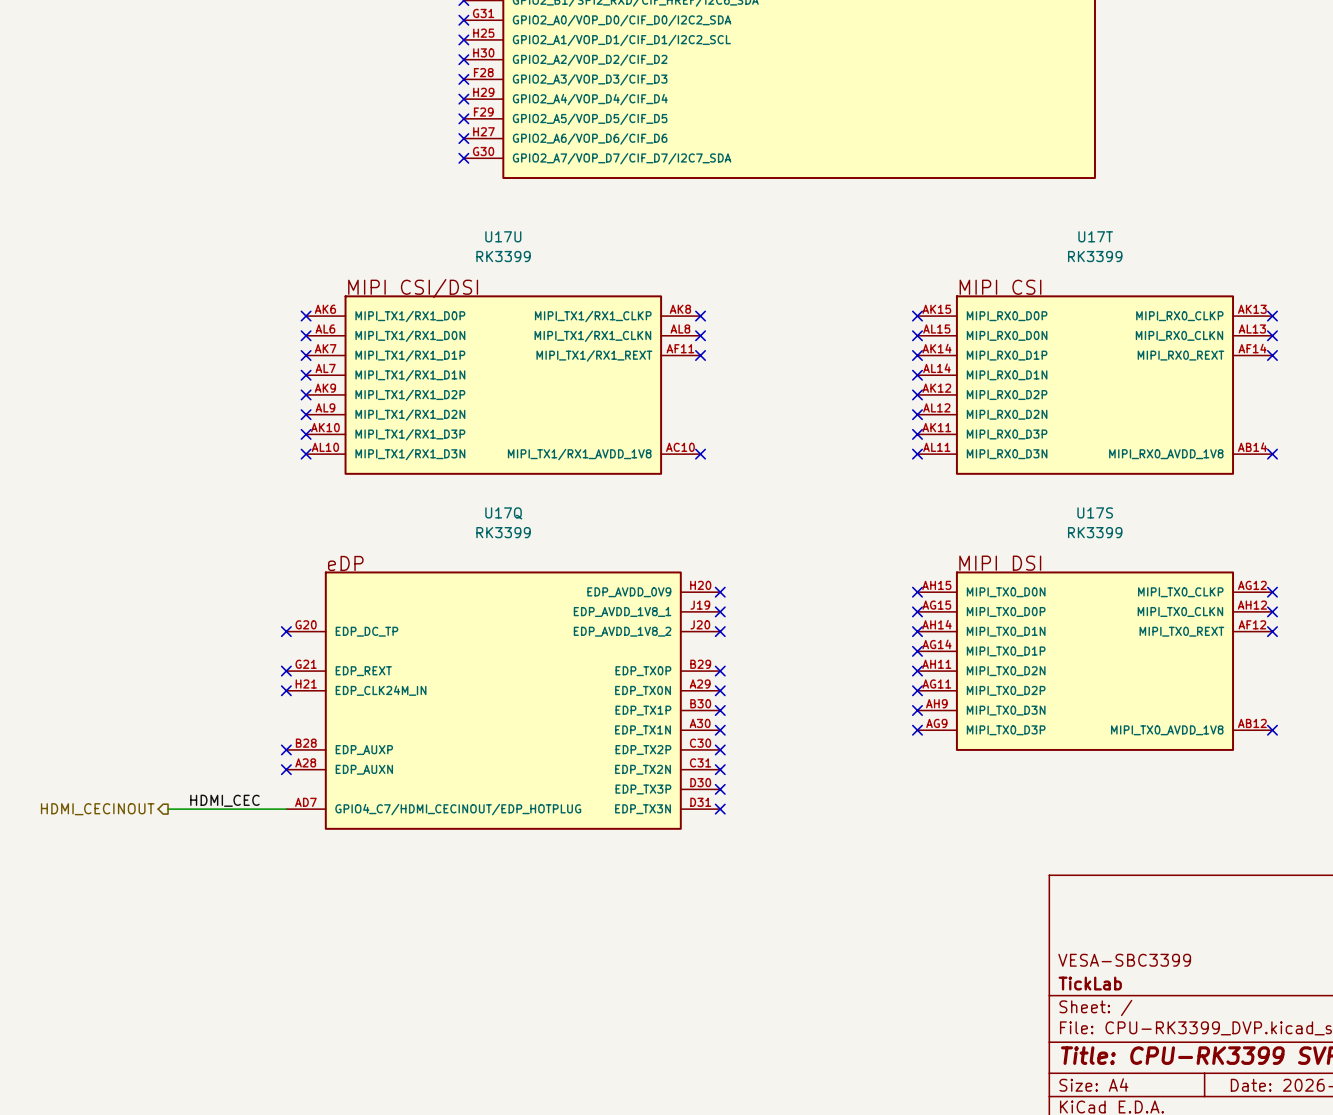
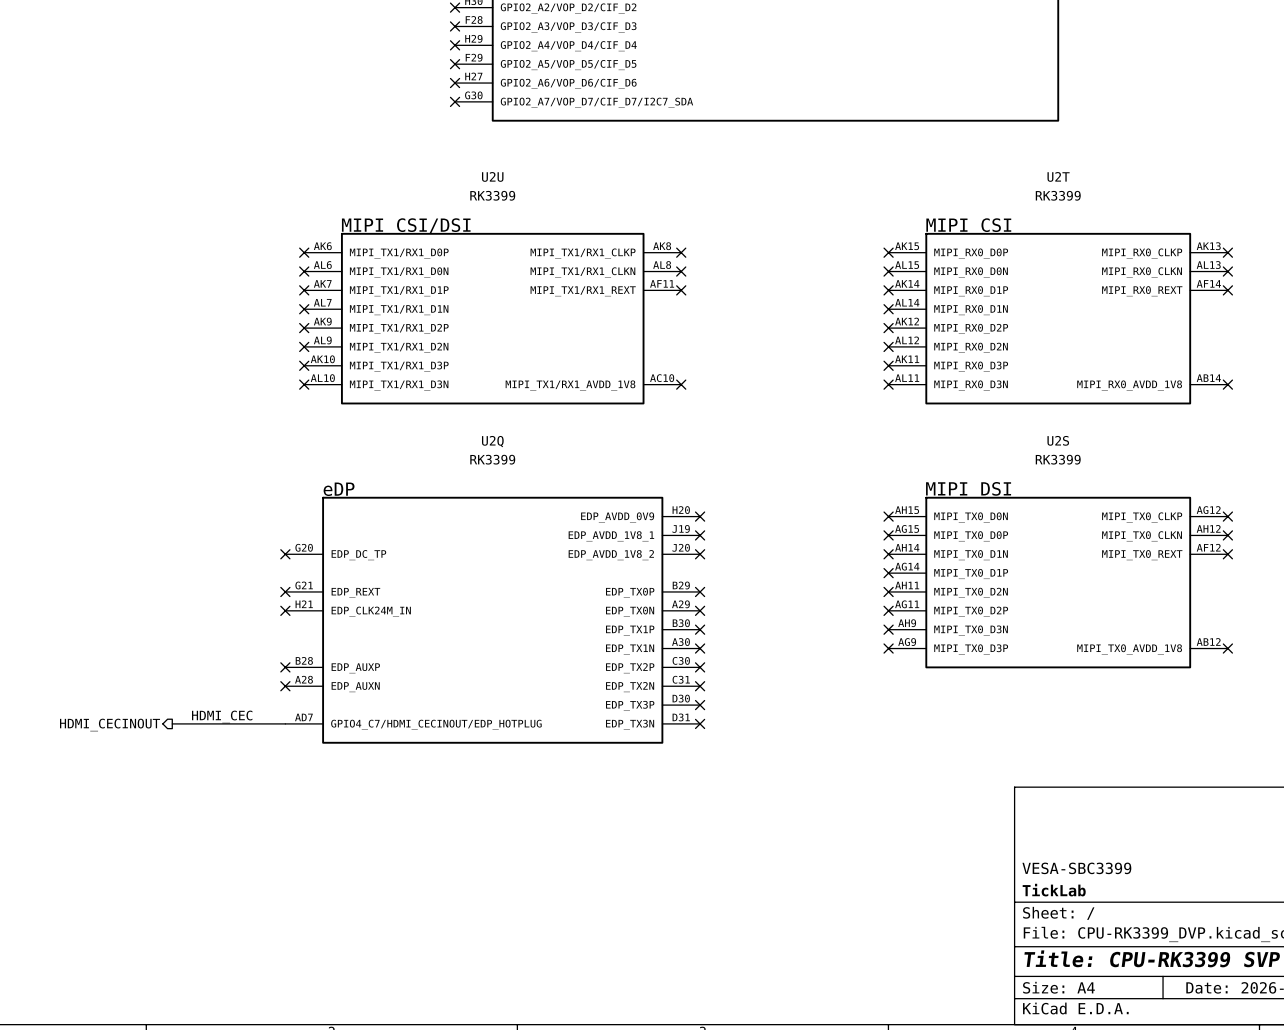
U17U name: U17U (503, 236) -> U2U (492, 176)
U17T name: U17T (1095, 236) -> U2T (1058, 176)
U17S name: U17S (1095, 512) -> U2S (1058, 440)
U17Q name: U17Q (503, 513) -> U2Q (492, 441)

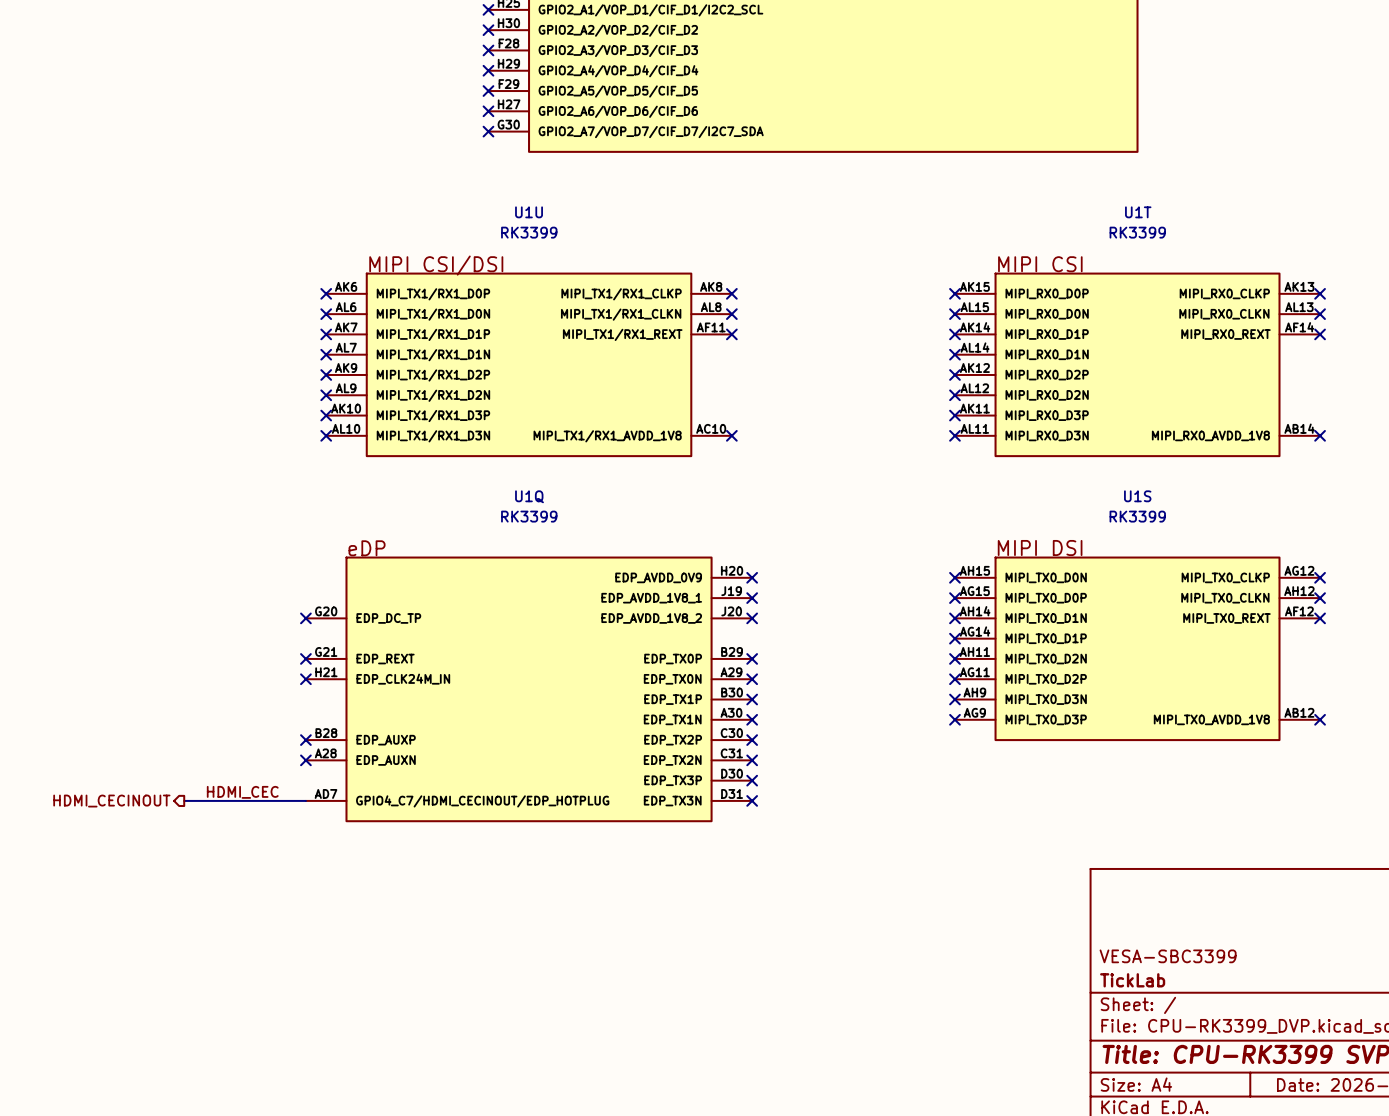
U2U name: U2U (492, 176) -> U1U (529, 212)
U2T name: U2T (1058, 176) -> U1T (1138, 212)
U2S name: U2S (1058, 440) -> U1S (1137, 496)
U2Q name: U2Q (492, 441) -> U1Q (529, 496)

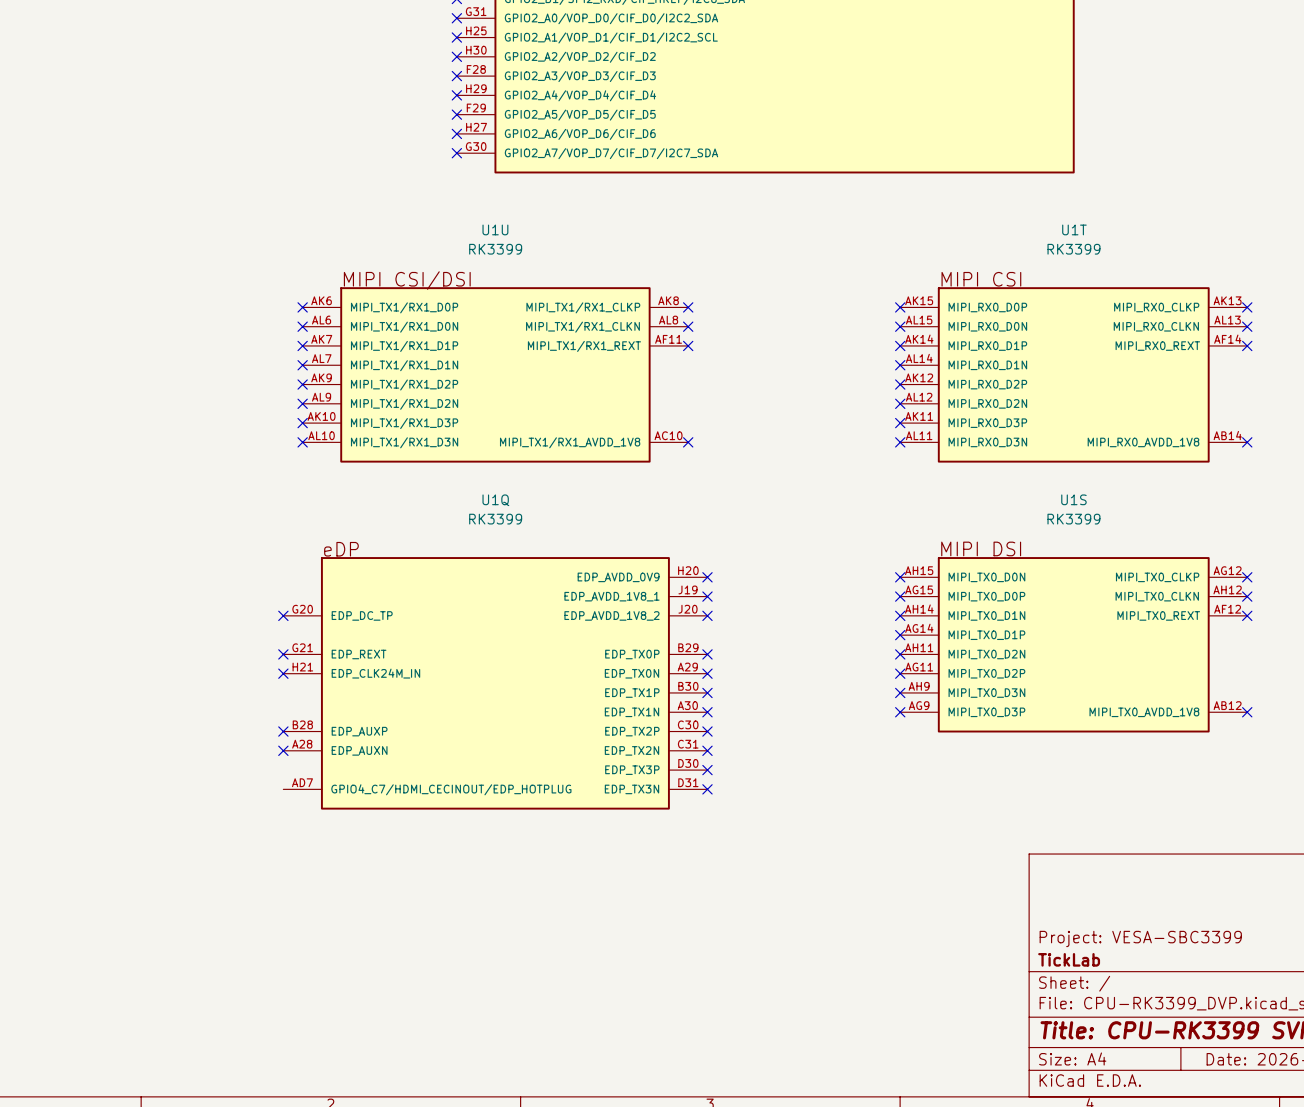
label: HDMI_CEC (242, 792) -> none
wire: (184, 800) (305, 800) -> none
hierarchical label: HDMI_CECINOUT (111, 801) -> none
title block: VESA-SBC3399 (1168, 956) -> Project: VESA-SBC3399 (1140, 938)

